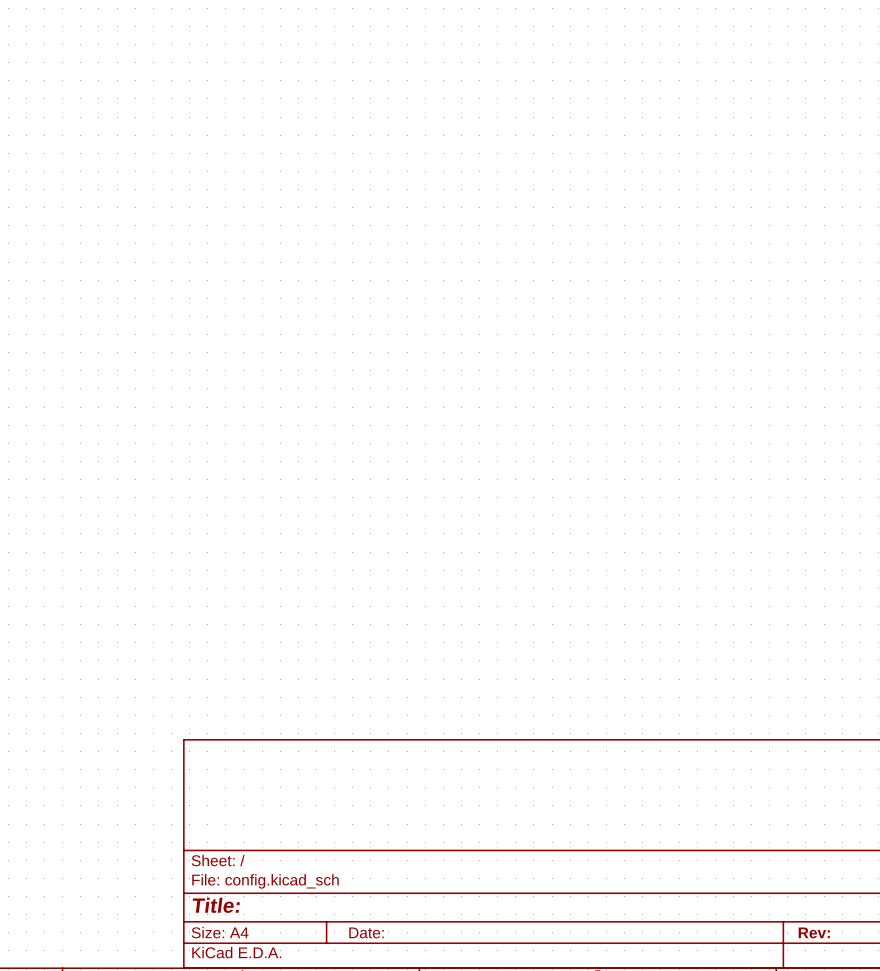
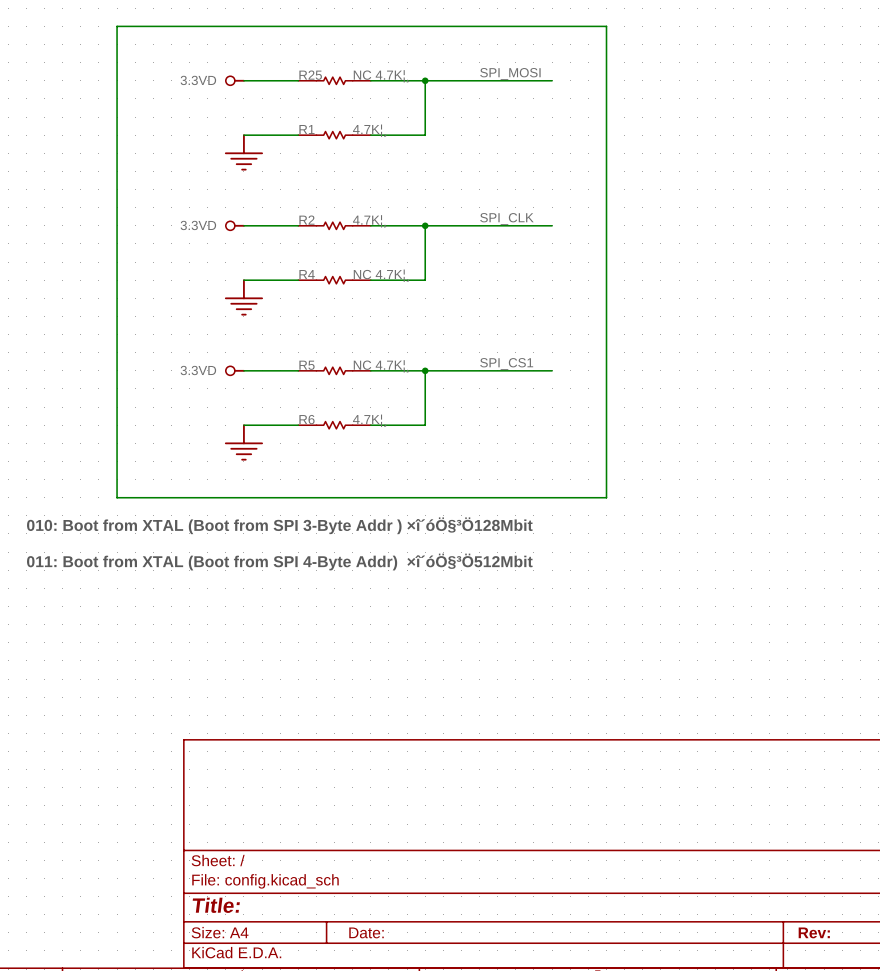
wire: none -> (117, 26) (117, 497) (606, 497) (606, 26) (117, 26)
label: none -> SPI_MOSI (510, 73)
power symbol: none -> 3.3VD (235, 80)
wire: none -> (243, 80) (298, 80)
R25: none -> (334, 80)
wire: none -> (370, 80) (552, 80)
wire: none -> (425, 80) (425, 135) (370, 135)
junction: none -> (425, 80)
wire: none -> (243, 135) (298, 135)
R1: none -> (334, 135)
power symbol: none -> (243, 152)
label: none -> SPI_CLK (506, 218)
power symbol: none -> 3.3VD (235, 225)
wire: none -> (243, 225) (298, 225)
R2: none -> (334, 225)
wire: none -> (370, 225) (552, 225)
wire: none -> (425, 225) (425, 280) (370, 280)
junction: none -> (425, 225)
wire: none -> (243, 280) (298, 280)
R4: none -> (334, 280)
power symbol: none -> (243, 297)
label: none -> SPI_CS1 (506, 363)
power symbol: none -> 3.3VD (235, 370)
wire: none -> (243, 370) (298, 370)
R5: none -> (334, 370)
wire: none -> (370, 370) (552, 370)
wire: none -> (425, 370) (425, 425) (370, 425)
junction: none -> (425, 370)
wire: none -> (243, 425) (298, 425)
R6: none -> (334, 425)
power symbol: none -> (243, 442)
text: none -> 010: Boot from XTAL (Boot from SPI 3-Byte Addr ) ×î´óÖ§³Ö128Mbit (279, 525)
text: none -> 011: Boot from XTAL (Boot from SPI 4-Byte Addr) ×î´óÖ§³Ö512Mbit (279, 562)

